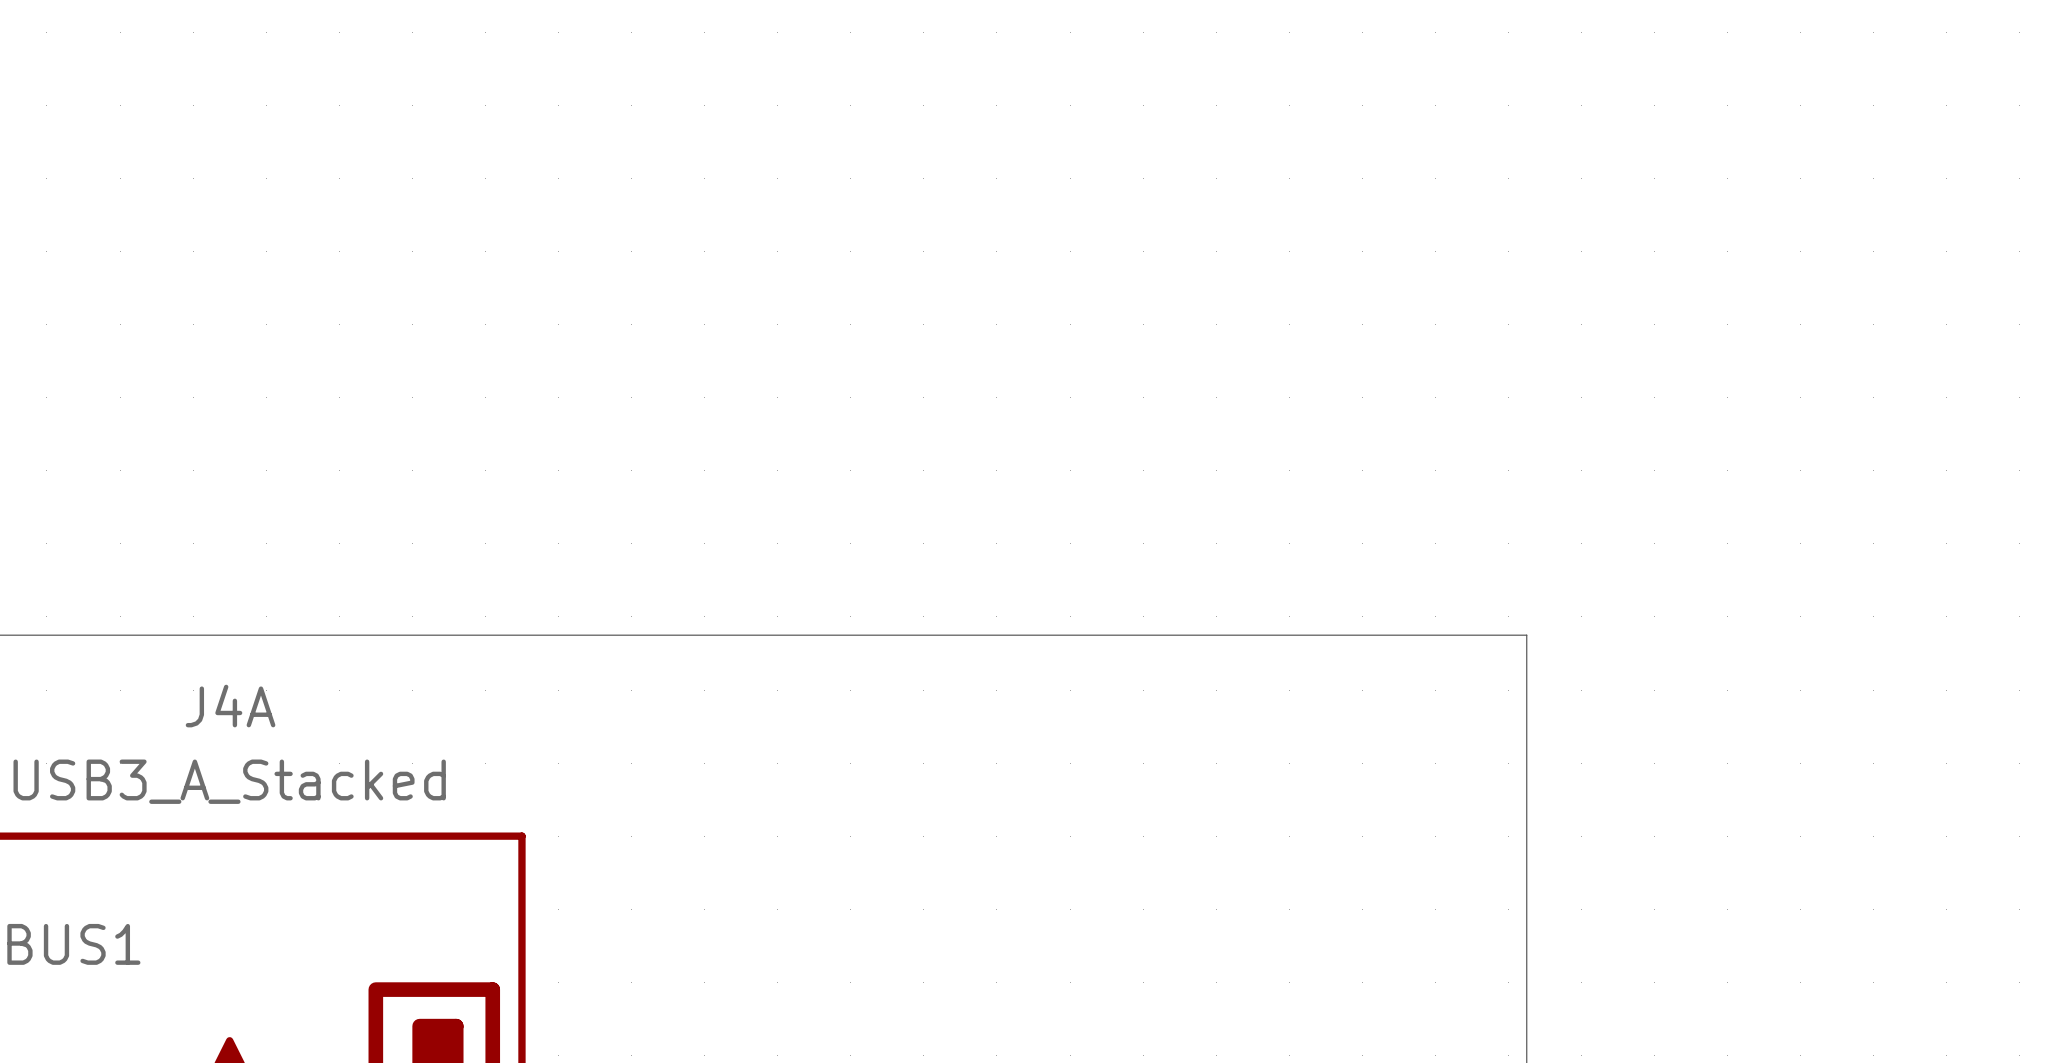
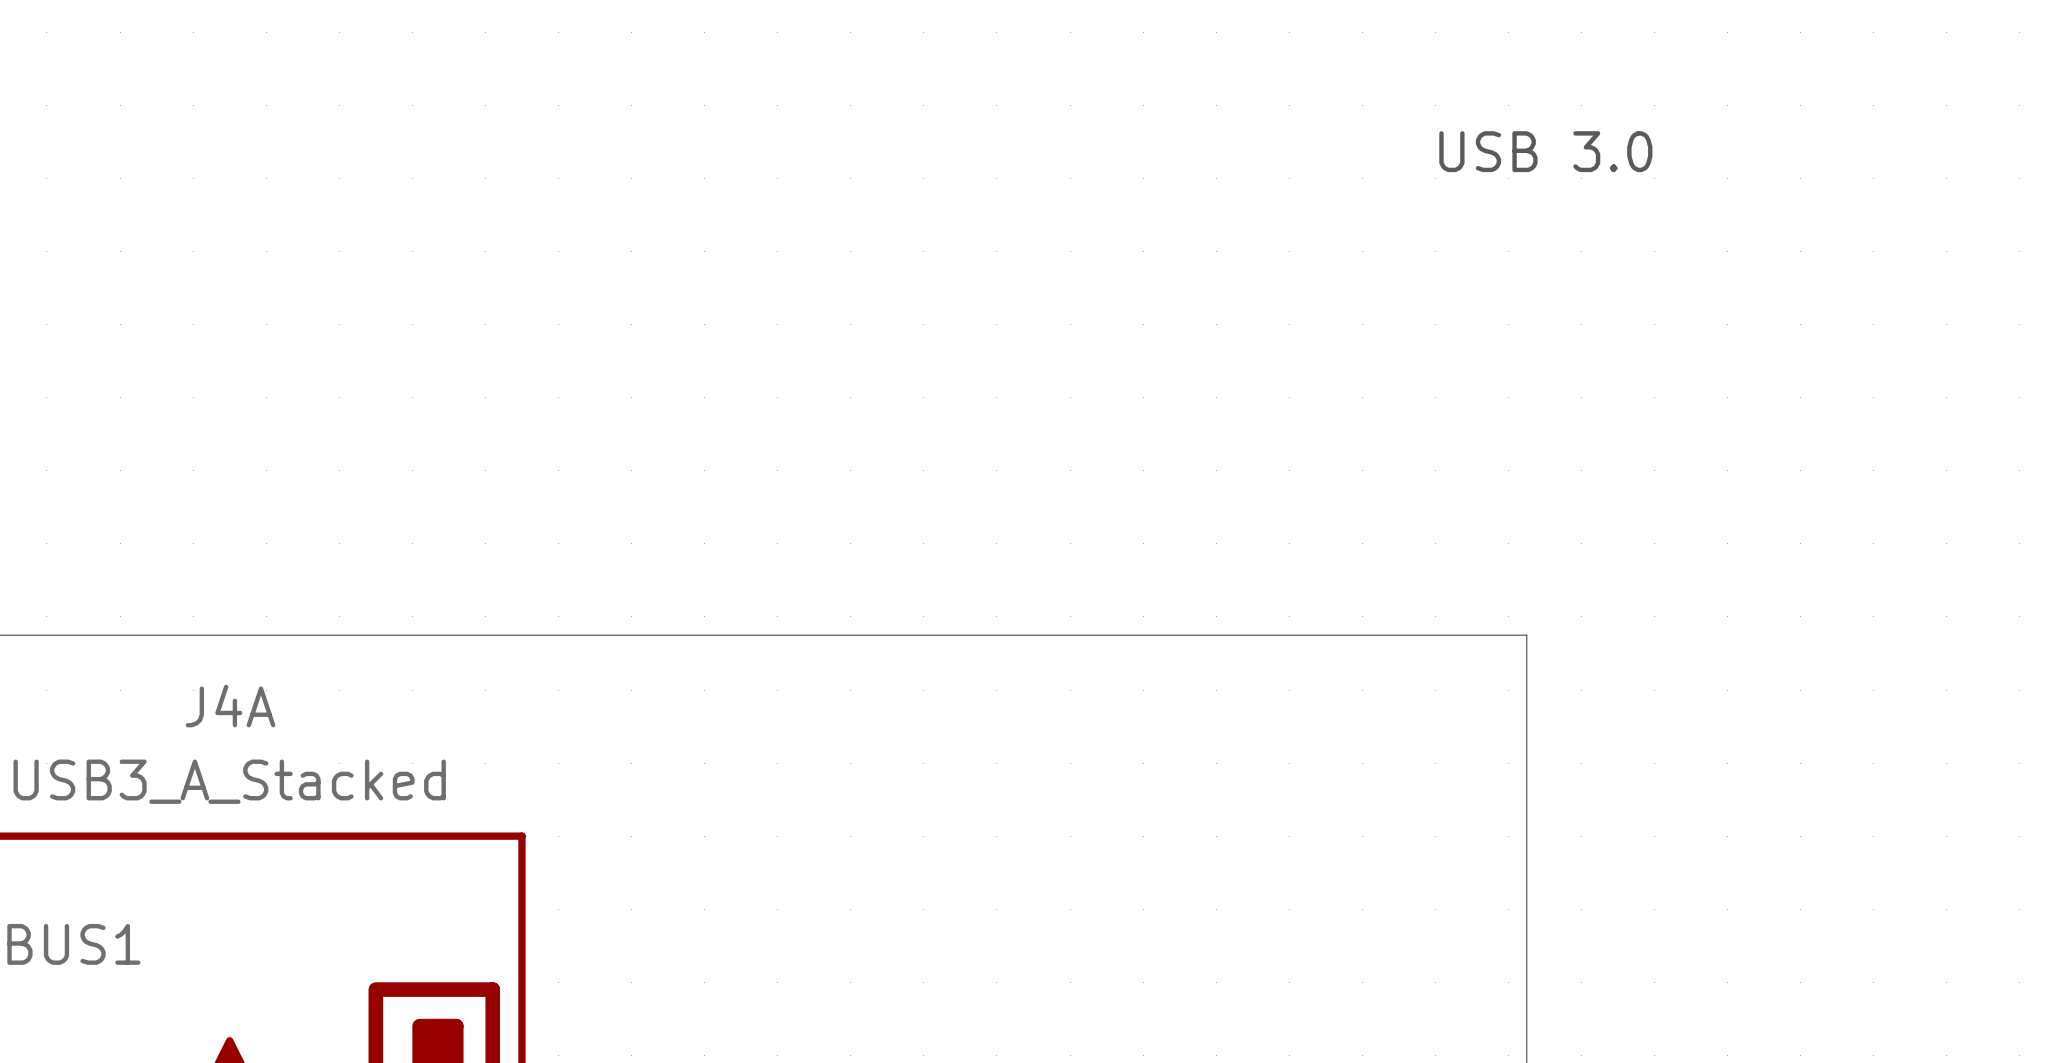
text: none -> USB 3.0 (1545, 151)

